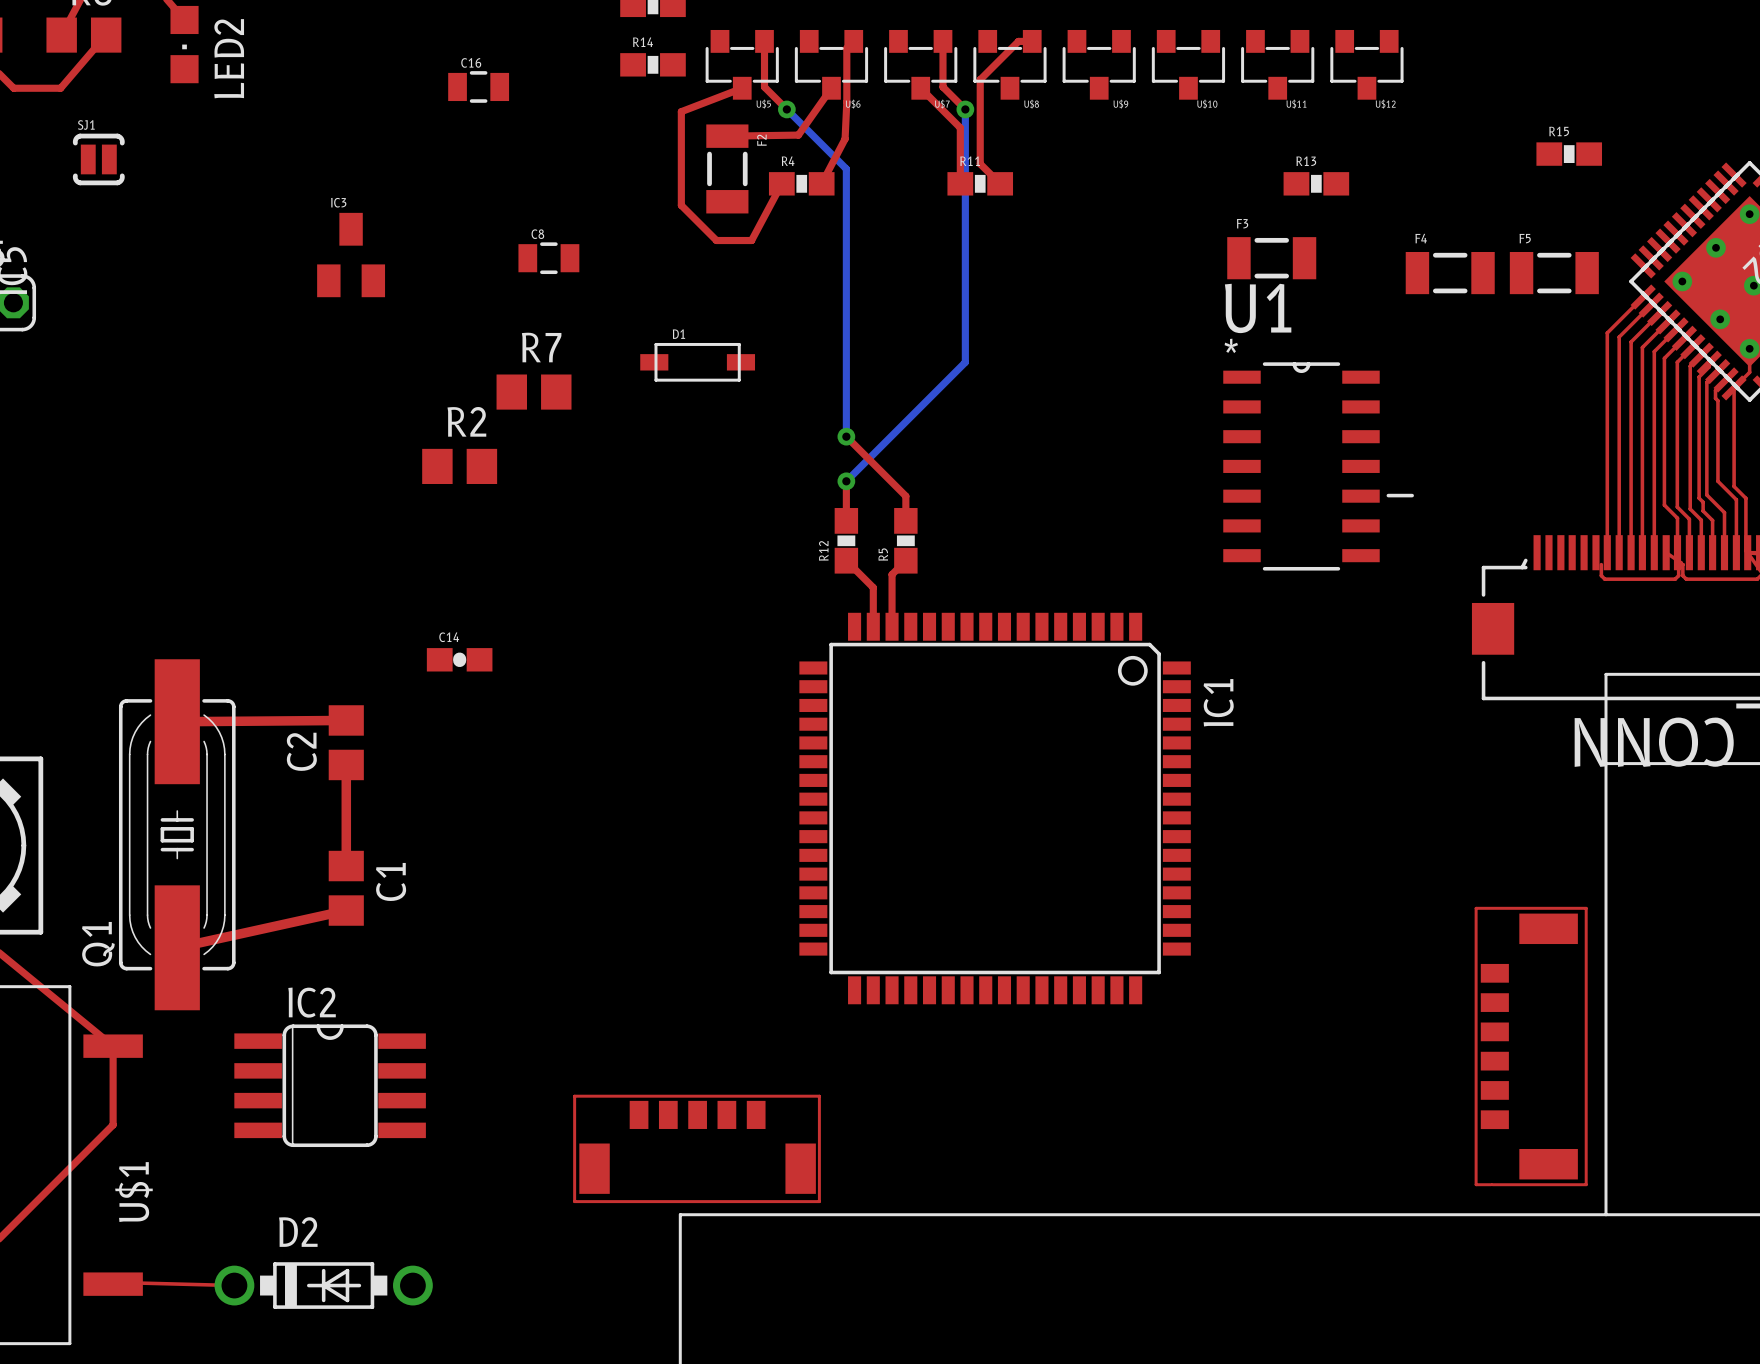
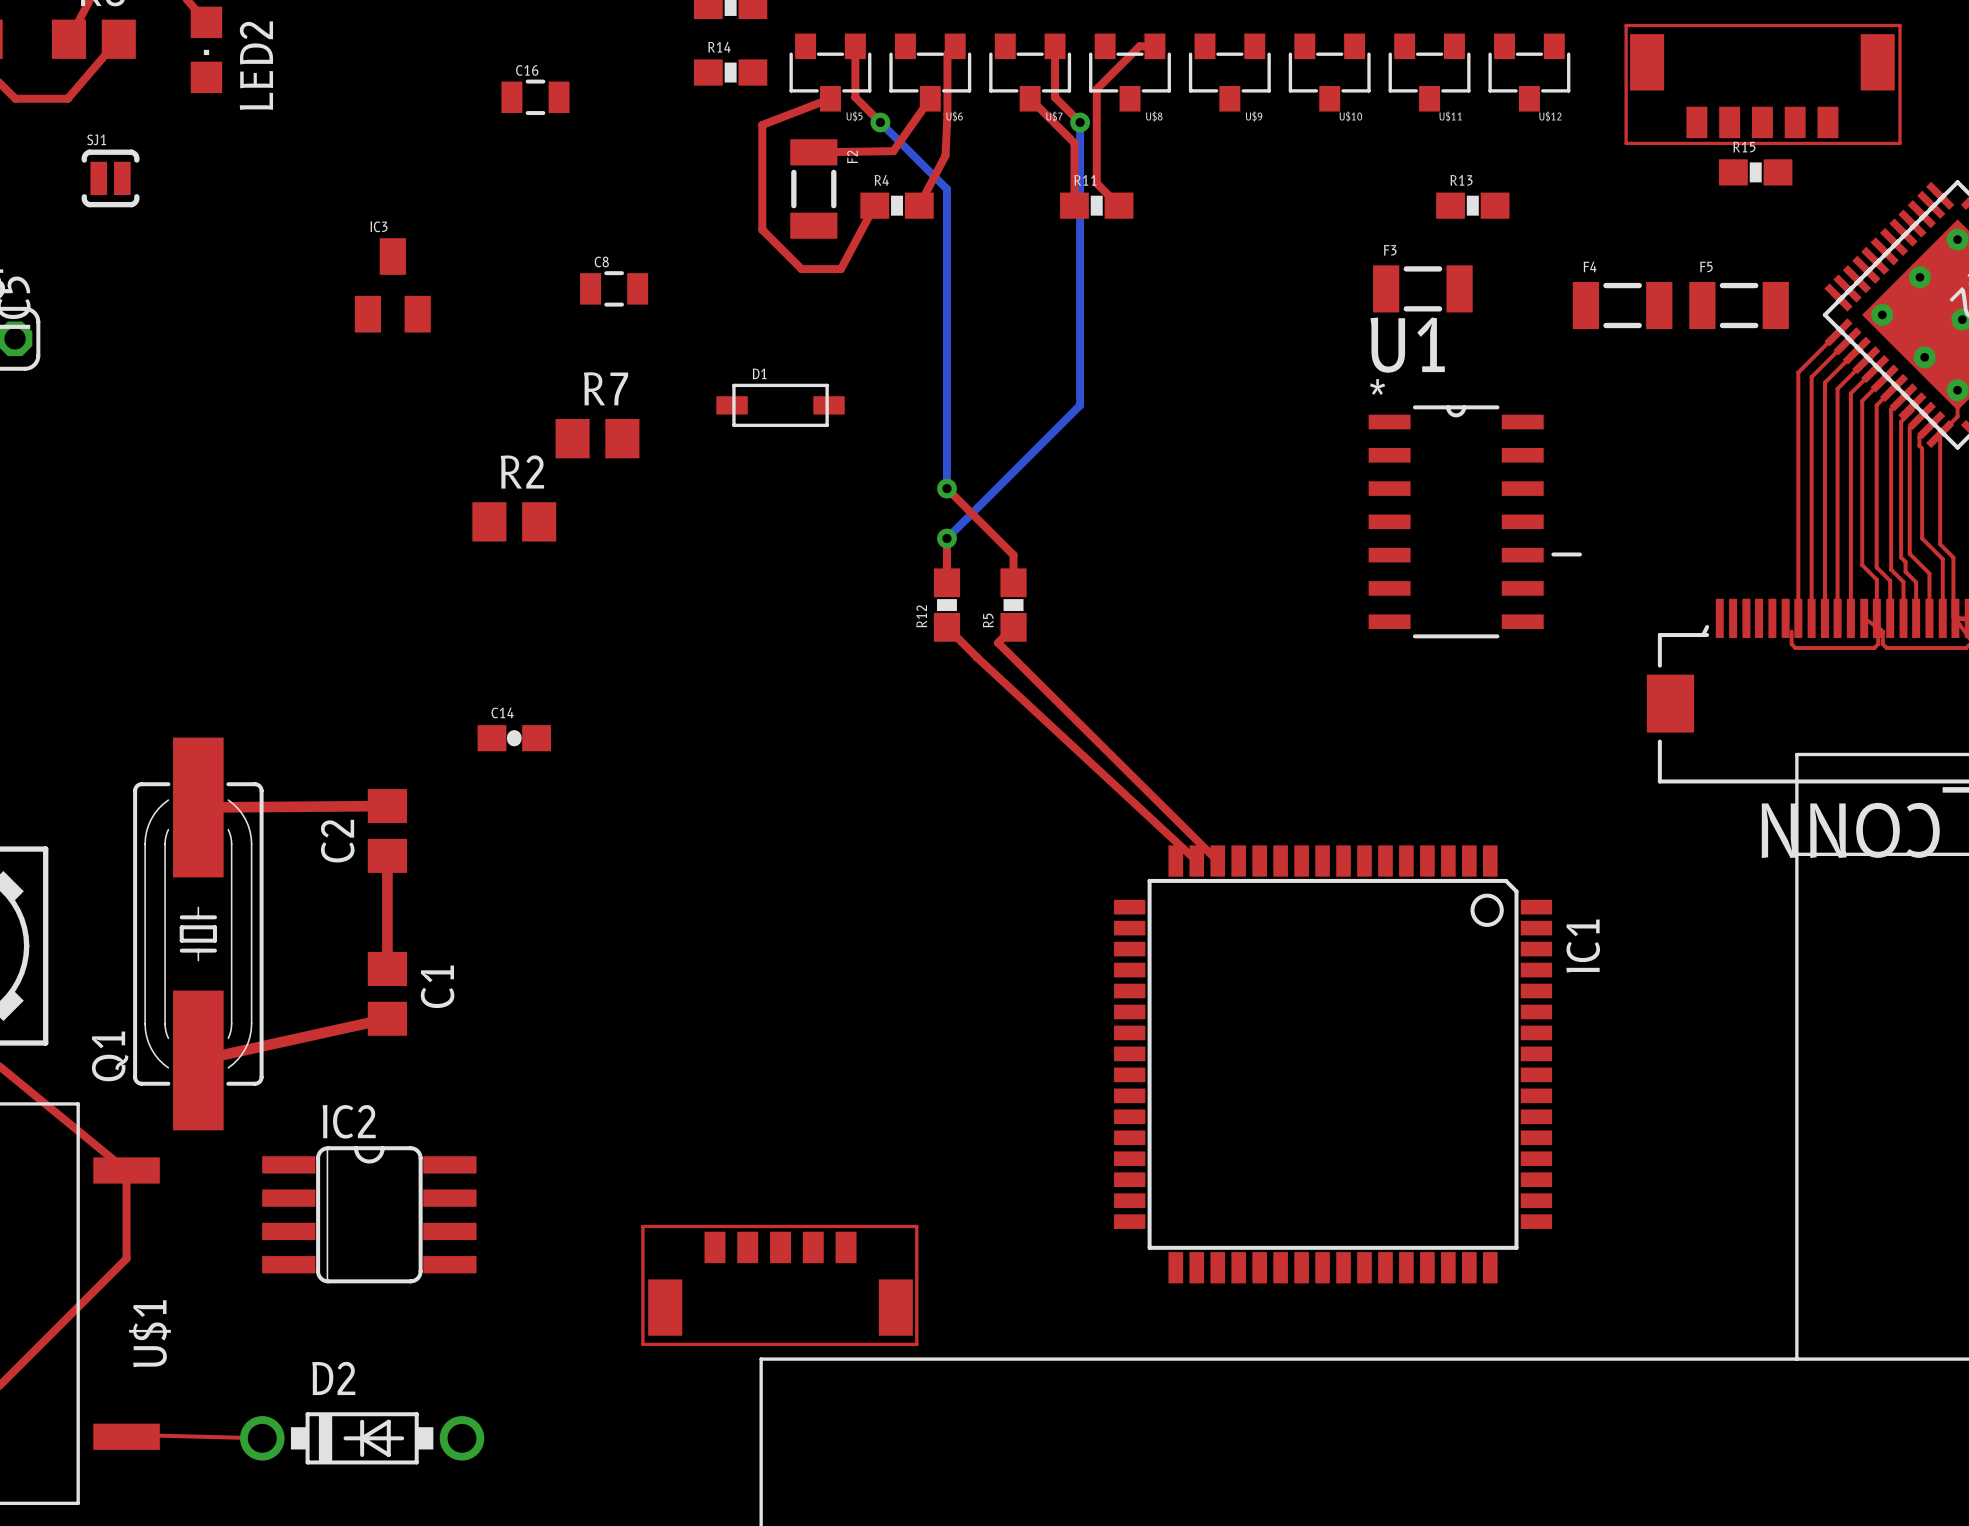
part: none -> (1763, 84)
top track: (892, 574) (892, 626) -> (998, 642) (1217, 861)
top track: (873, 587) (873, 626) -> (977, 657) (1196, 861)
IC1 position: (995, 808) -> (1333, 1064)
part: (1531, 1046) -> none

